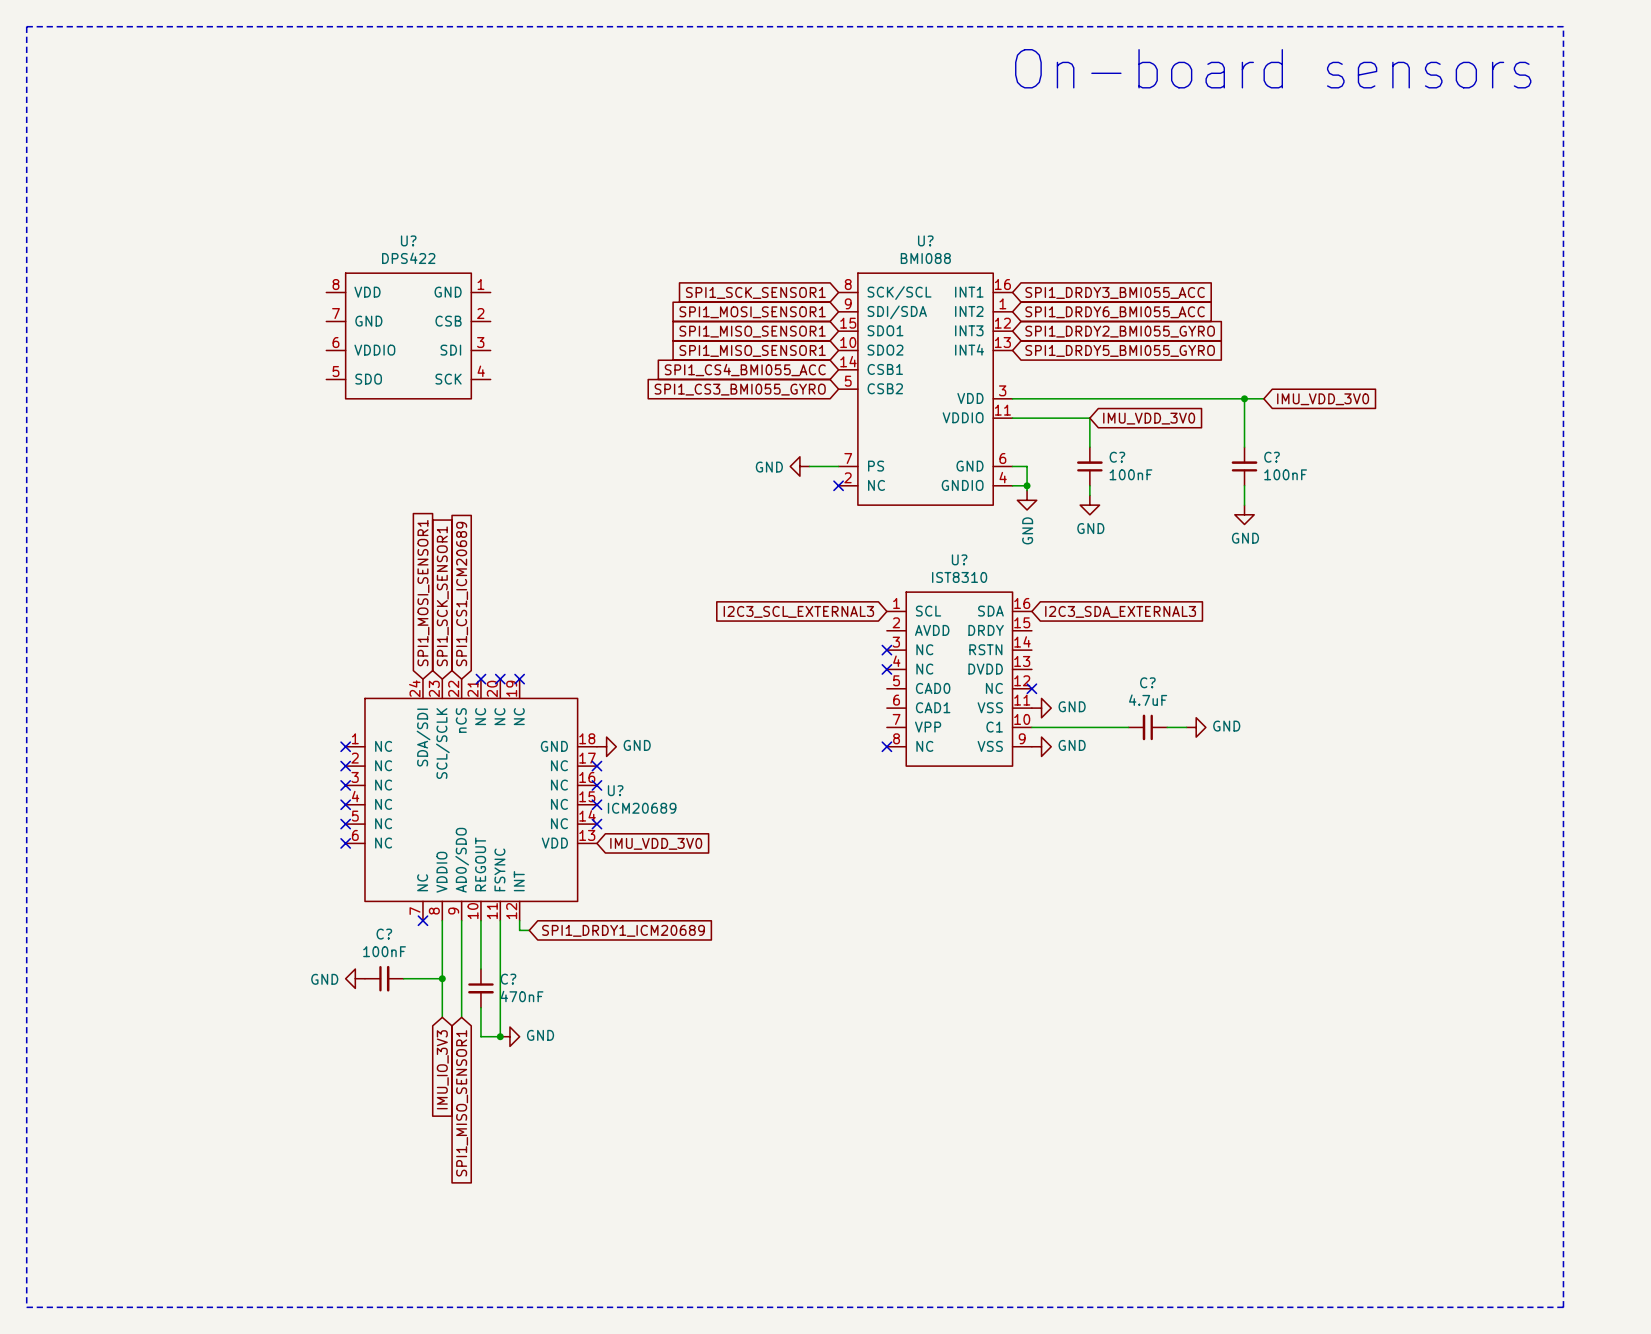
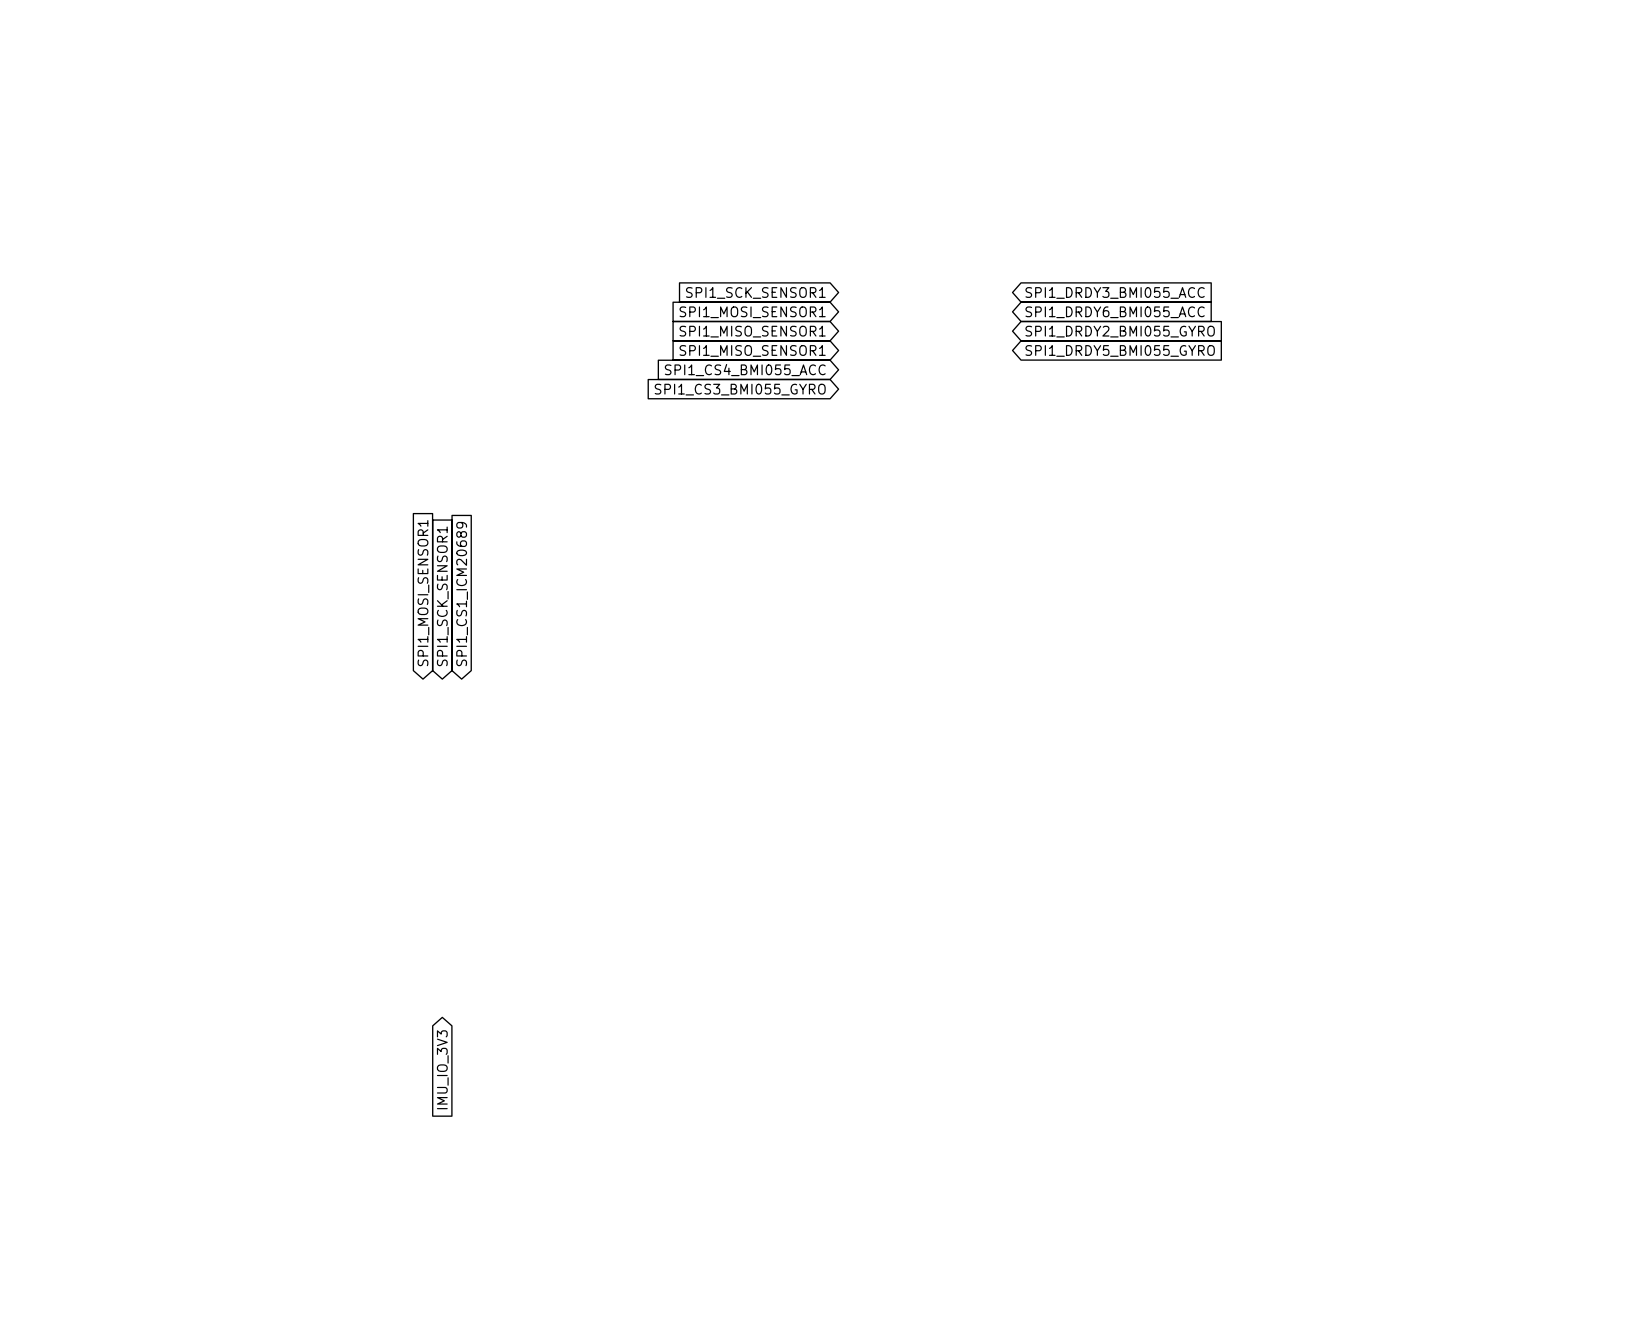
line: (26, 26) (1563, 26) (1563, 1307) (26, 1307) (26, 26) -> none
text: On-board sensors (1273, 68) -> none
U?: DPS422 (408, 335) -> none
U?: BMI088 (925, 389) -> none
wire: (1012, 398) (1263, 398) -> none
wire: (1244, 398) (1244, 447) -> none
junction: (1244, 398) -> none
global label: IMU_VDD_3V0 (1323, 399) -> none
wire: (1012, 418) (1089, 418) (1089, 447) -> none
global label: IMU_VDD_3V0 (1149, 418) -> none
power symbol: GND (799, 466) -> none
wire: (809, 466) (838, 466) -> none
wire: (1012, 466) (1027, 466) (1027, 490) -> none
C?: 100nF (1089, 466) -> none
C?: 100nF (1244, 466) -> none
no-connect mark: (838, 485) -> none
wire: (1012, 485) (1027, 485) -> none
junction: (1027, 485) -> none
wire: (1089, 485) (1089, 495) -> none
wire: (1244, 485) (1244, 505) -> none
power symbol: GND (1027, 500) -> none
power symbol: GND (1089, 505) -> none
power symbol: GND (1244, 514) -> none
global label: I2C3_SCL_EXTERNAL3 (798, 611) -> none
global label: I2C3_SDA_EXTERNAL3 (1120, 611) -> none
no-connect mark: (886, 650) -> none
no-connect mark: (886, 669) -> none
no-connect mark: (480, 679) -> none
no-connect mark: (500, 679) -> none
no-connect mark: (519, 679) -> none
U?: IST8310 (959, 679) -> none
no-connect mark: (1031, 688) -> none
power symbol: GND (1041, 708) -> none
wire: (1031, 727) (1128, 727) -> none
C?: 4.7uF (1147, 727) -> none
wire: (1167, 727) (1186, 727) -> none
power symbol: GND (1196, 727) -> none
no-connect mark: (345, 746) -> none
power symbol: GND (606, 746) -> none
no-connect mark: (886, 746) -> none
power symbol: GND (1041, 746) -> none
no-connect mark: (345, 766) -> none
no-connect mark: (596, 766) -> none
no-connect mark: (345, 785) -> none
no-connect mark: (596, 785) -> none
U?: ICM20689 (471, 799) -> none
no-connect mark: (345, 804) -> none
no-connect mark: (596, 804) -> none
no-connect mark: (345, 824) -> none
no-connect mark: (596, 824) -> none
no-connect mark: (345, 843) -> none
global label: IMU_VDD_3V0 (656, 843) -> none
no-connect mark: (422, 920) -> none
wire: (442, 920) (442, 1017) -> none
wire: (461, 920) (461, 1017) -> none
wire: (480, 920) (480, 969) -> none
wire: (500, 920) (500, 1036) (480, 1036) (480, 1007) -> none
wire: (519, 920) (519, 930) (529, 930) -> none
global label: SPI1_DRDY1_ICM20689 (623, 930) -> none
power symbol: GND (355, 978) -> none
C?: 100nF (384, 978) -> none
wire: (403, 978) (442, 978) -> none
junction: (442, 978) -> none
C?: 470nF (480, 988) -> none
junction: (500, 1036) -> none
power symbol: GND (509, 1036) -> none
global label: SPI1_MISO_SENSOR1 (462, 1103) -> none

